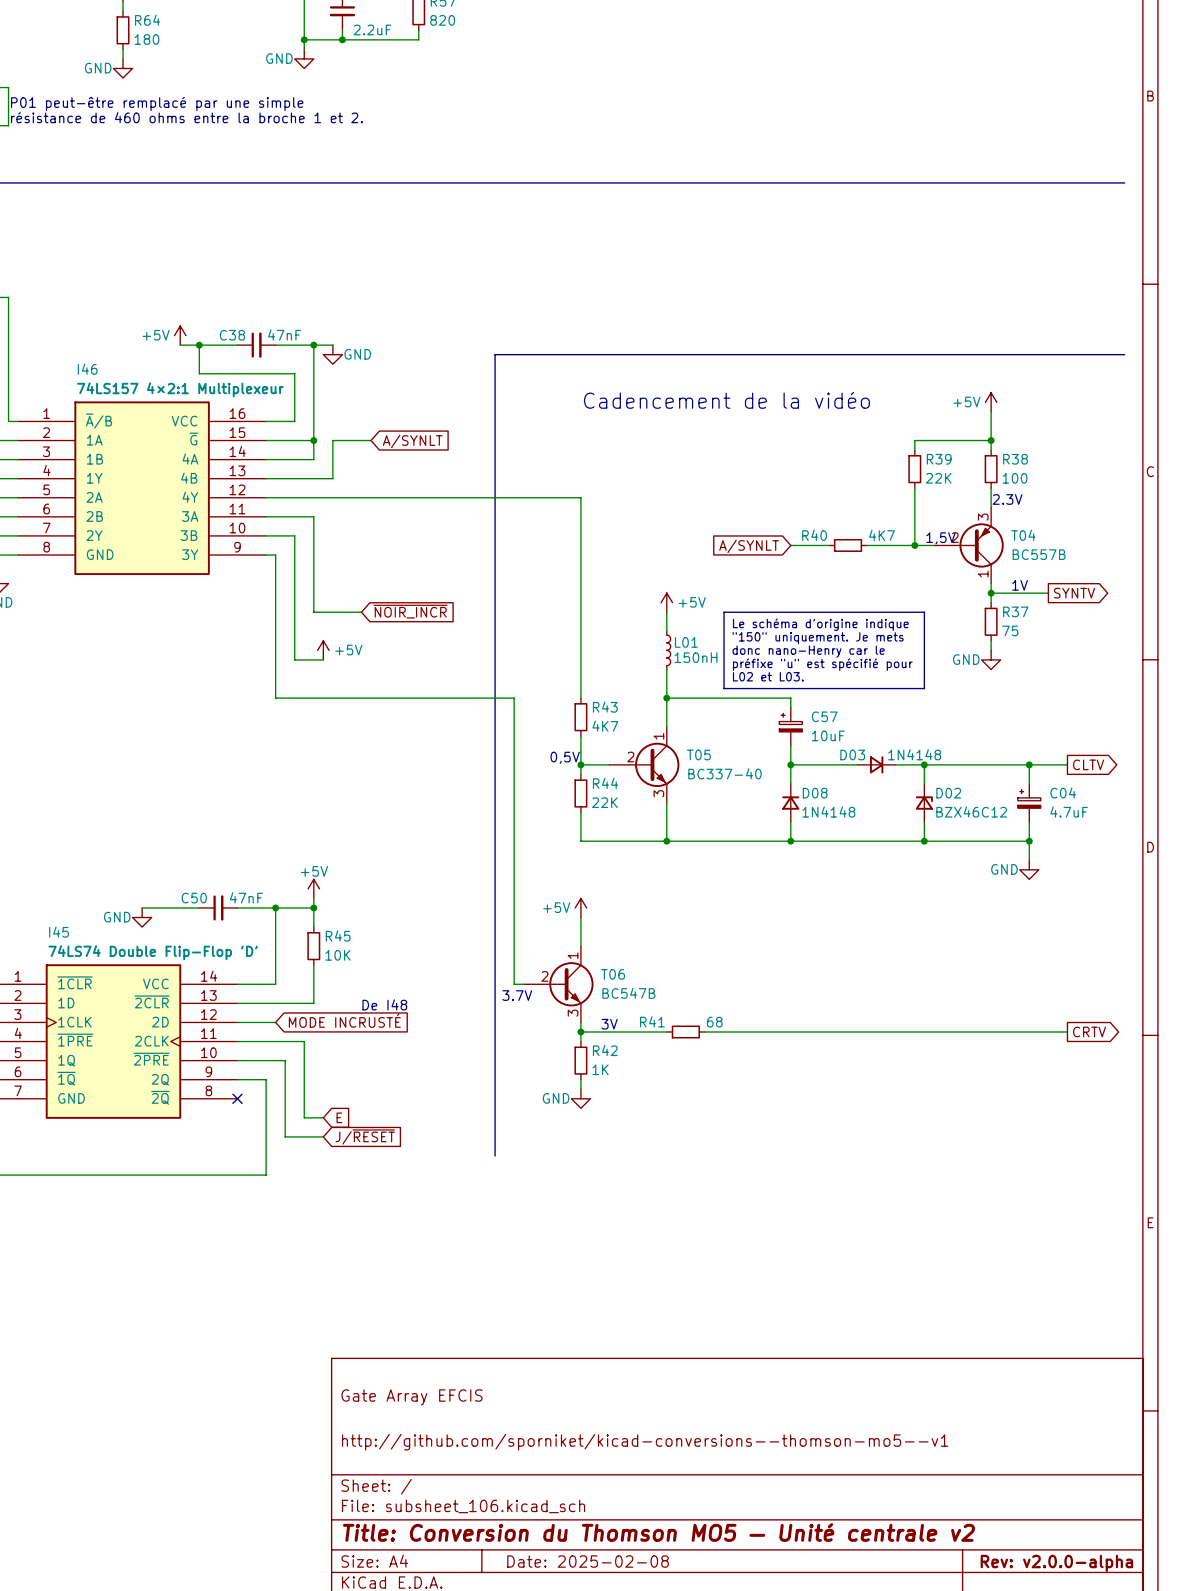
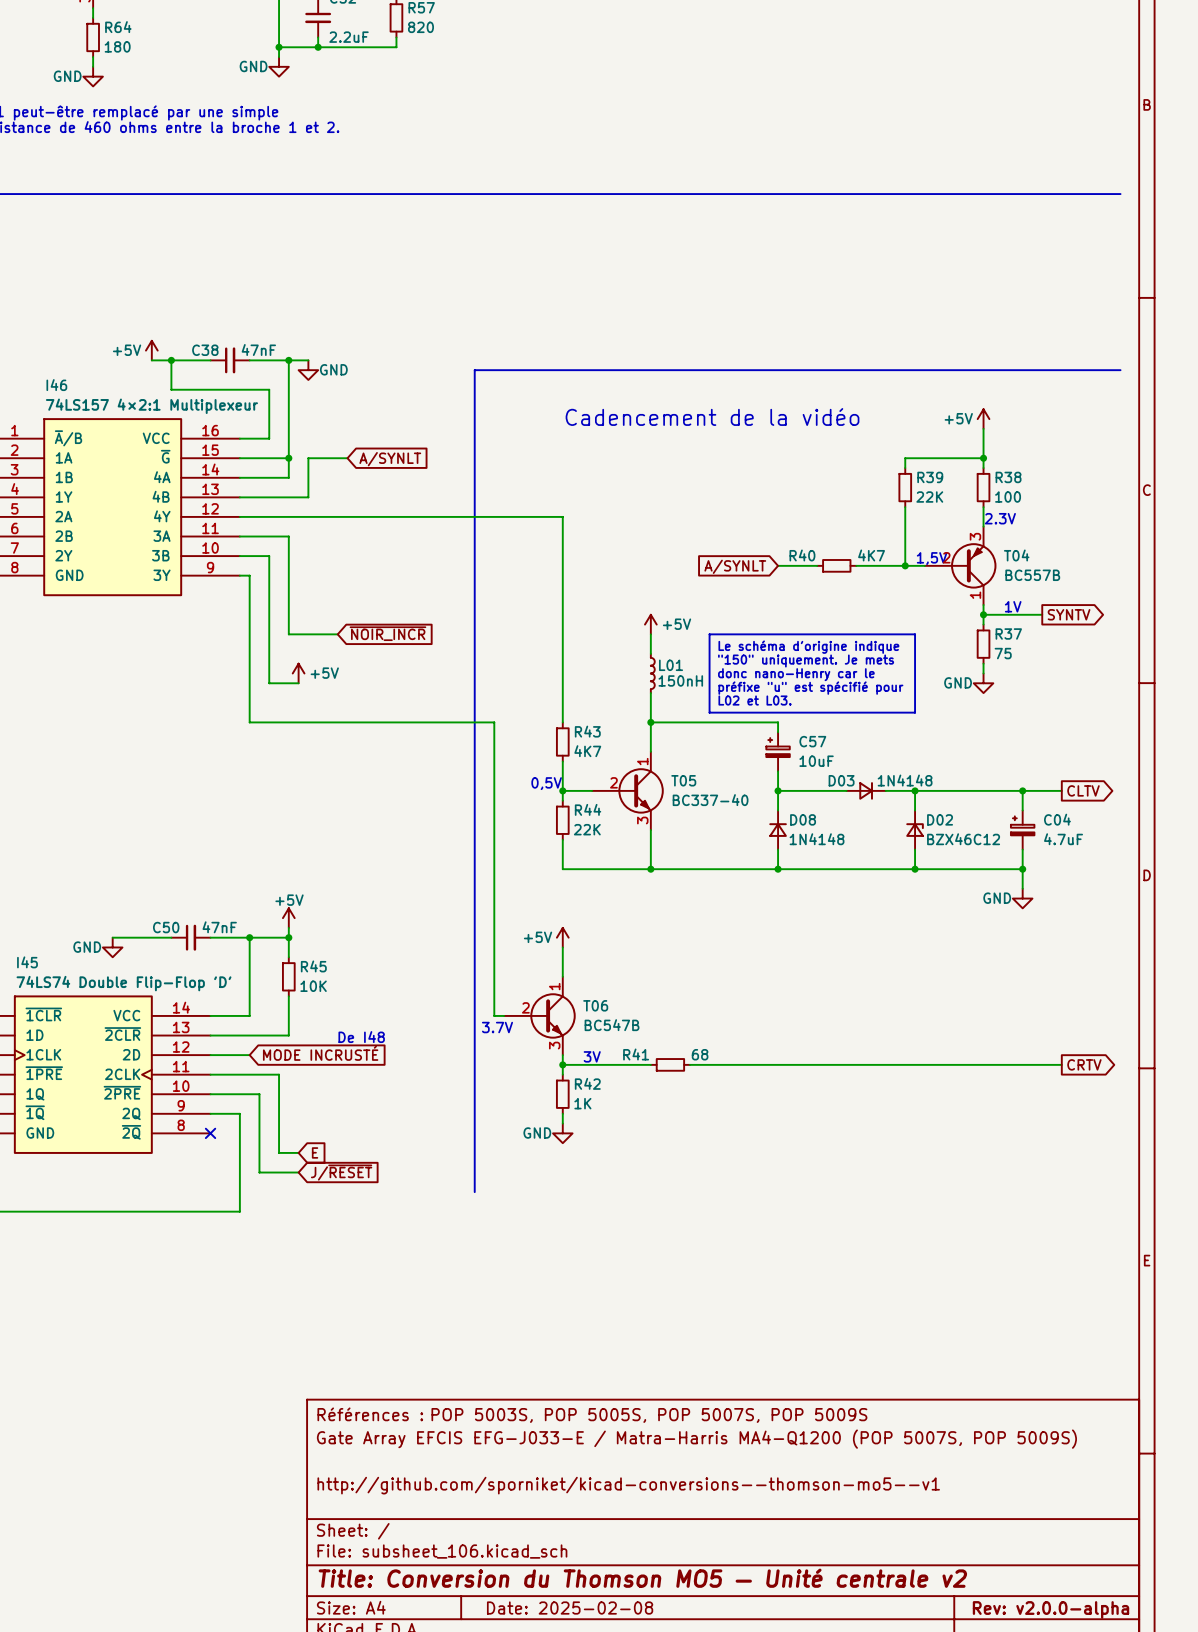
title block: none -> Références : POP 5003S, POP 5005S, POP 5007S, POP 5009S (592, 1415)
title block: Gate Array EFCIS (412, 1397) -> Gate Array EFCIS EFG-J033-E / Matra-Harris MA4-Q1200 (POP 5007S, POP 5009S) (696, 1439)

